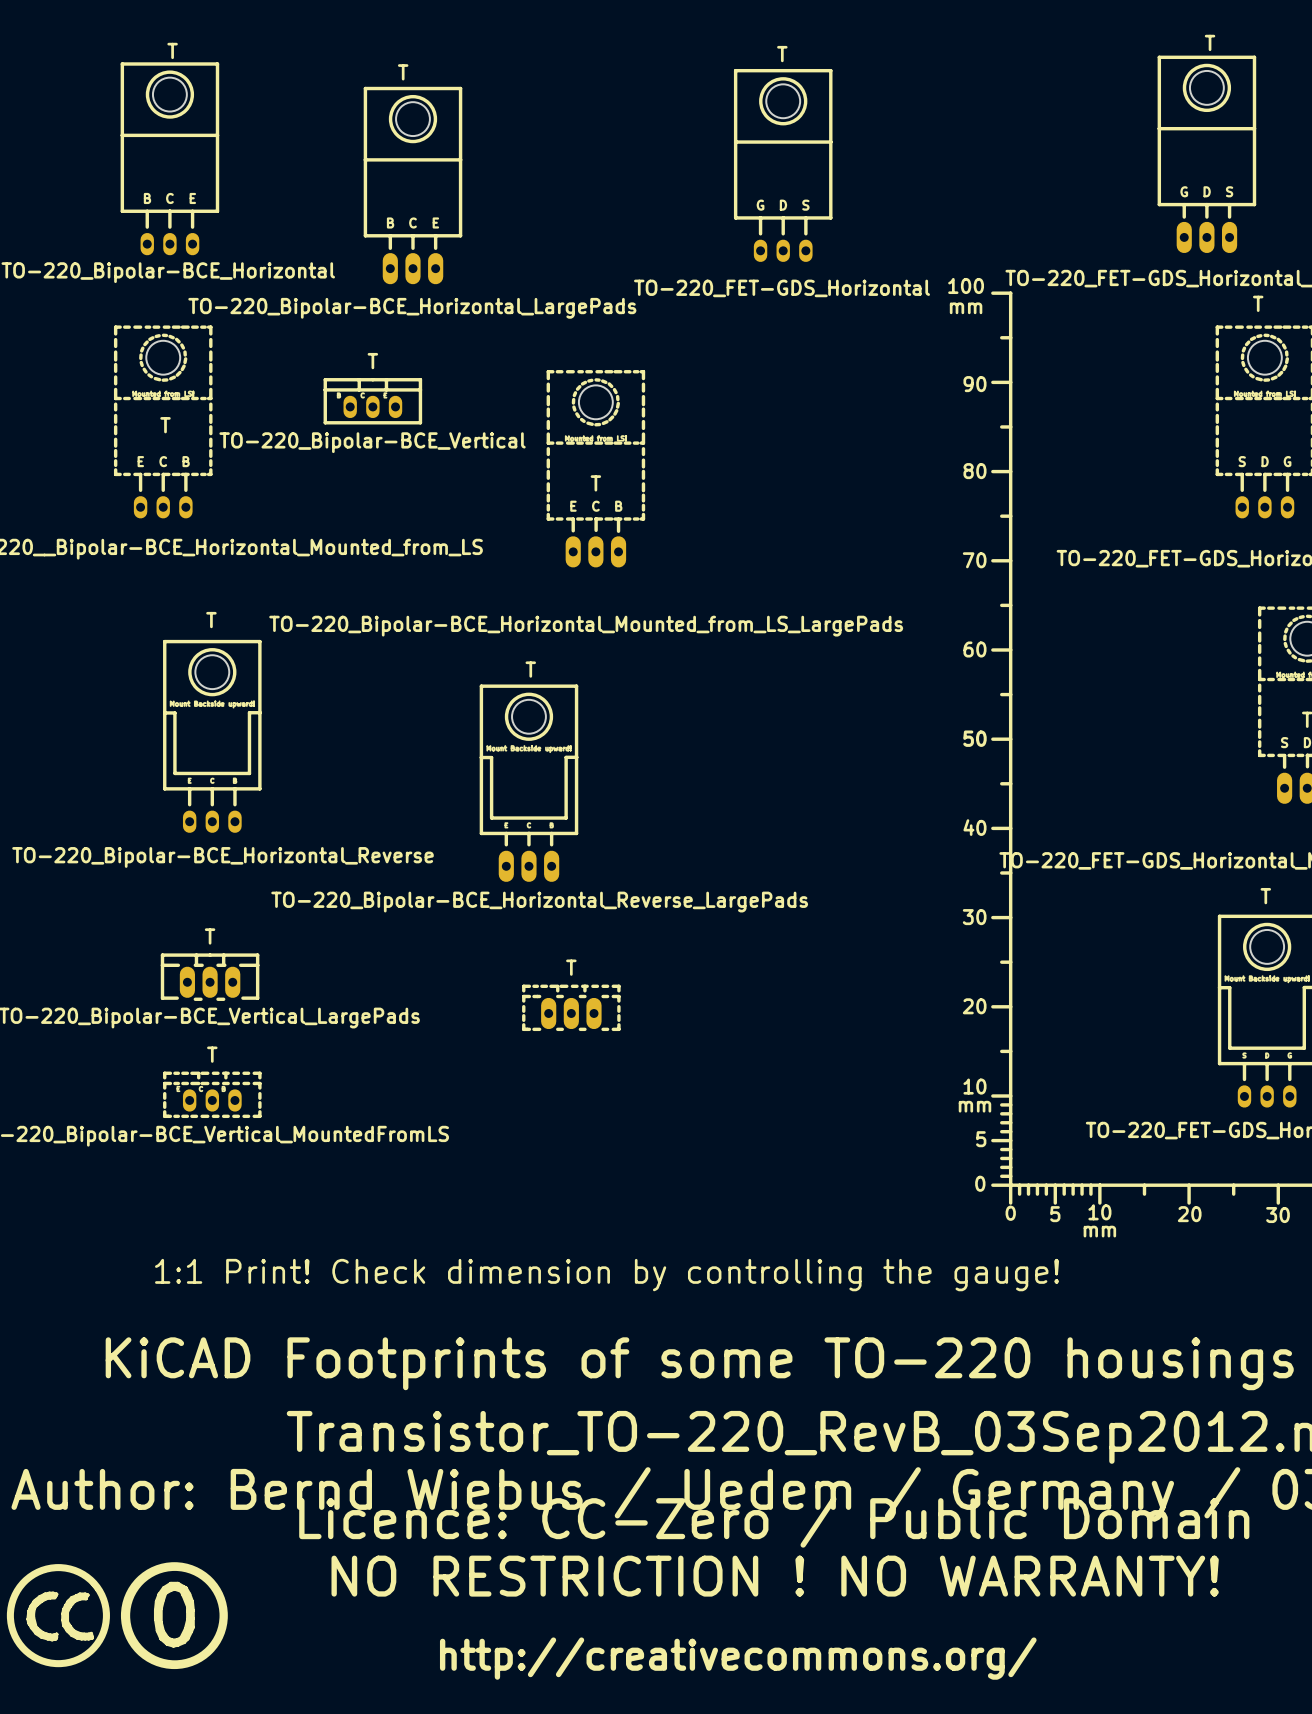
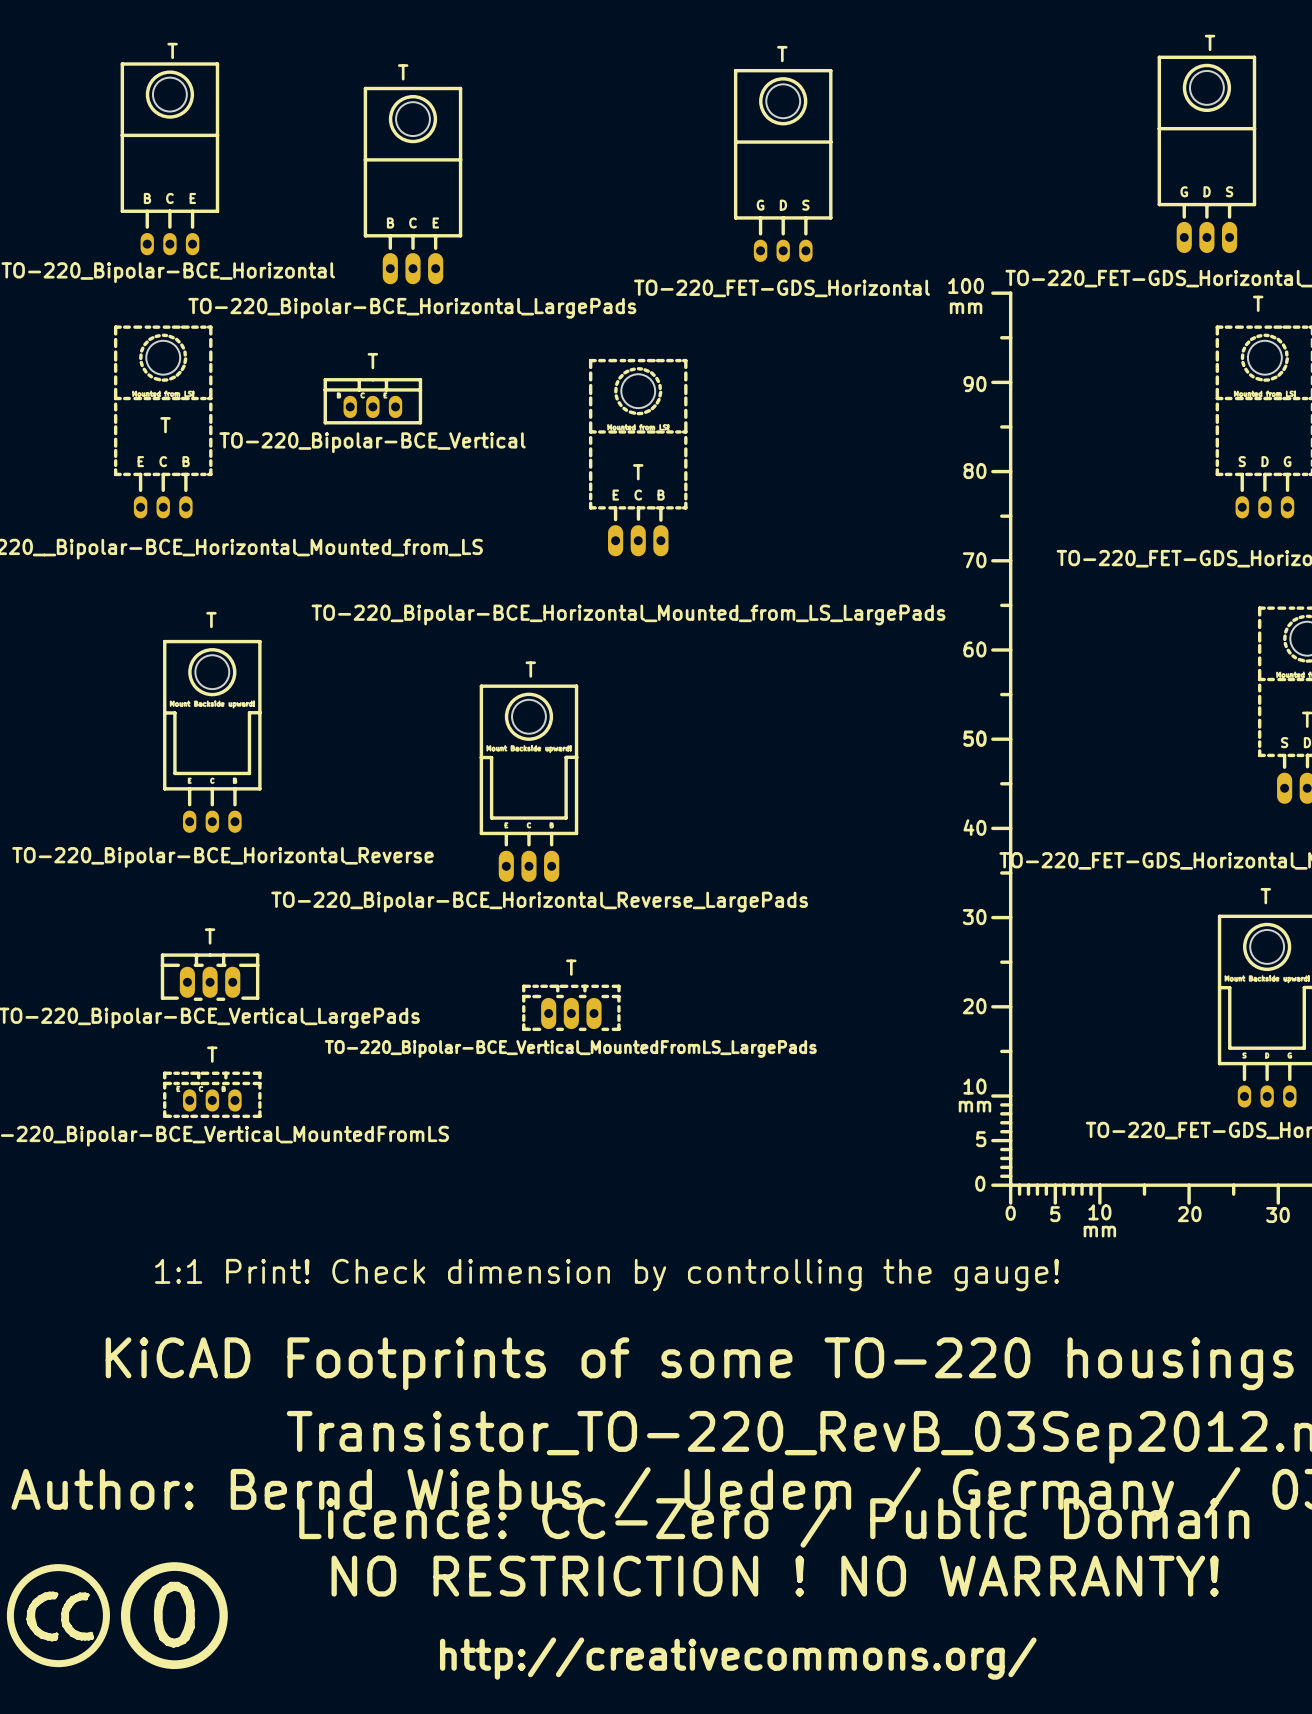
T position: (595, 468) -> (638, 457)
T value: none -> TO-220_Bipolar-BCE_Vertical_MountedFromLS_LargePads (570, 1048)

